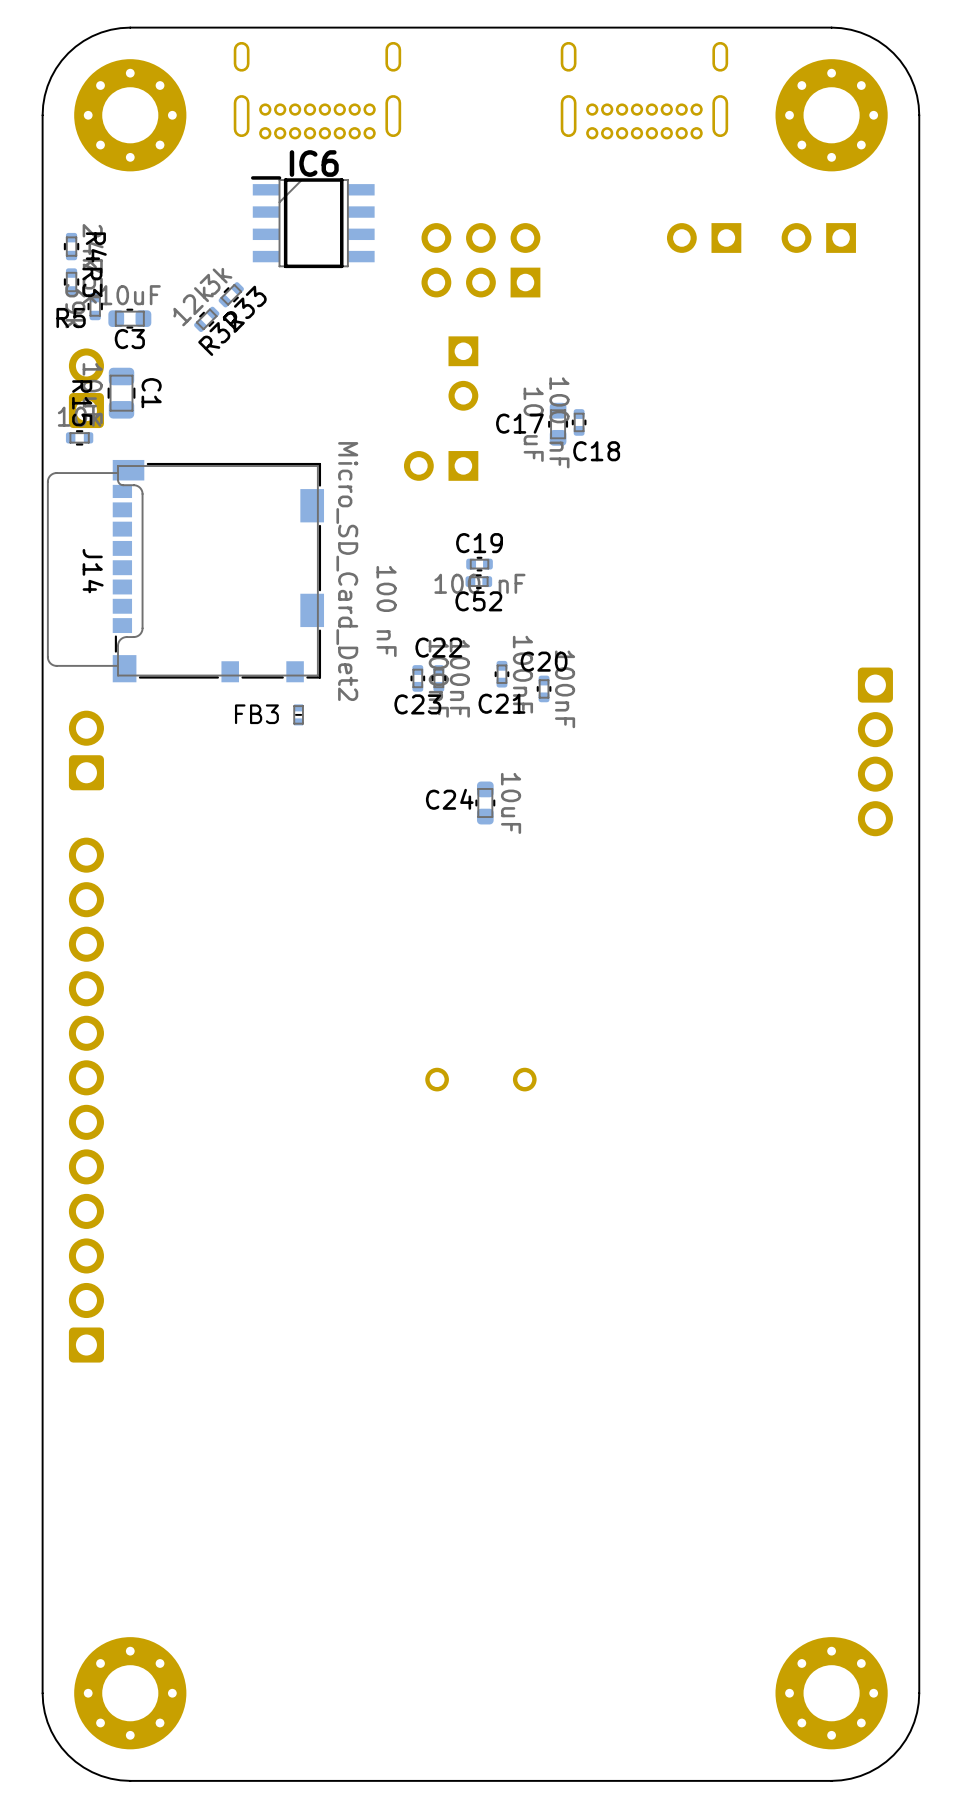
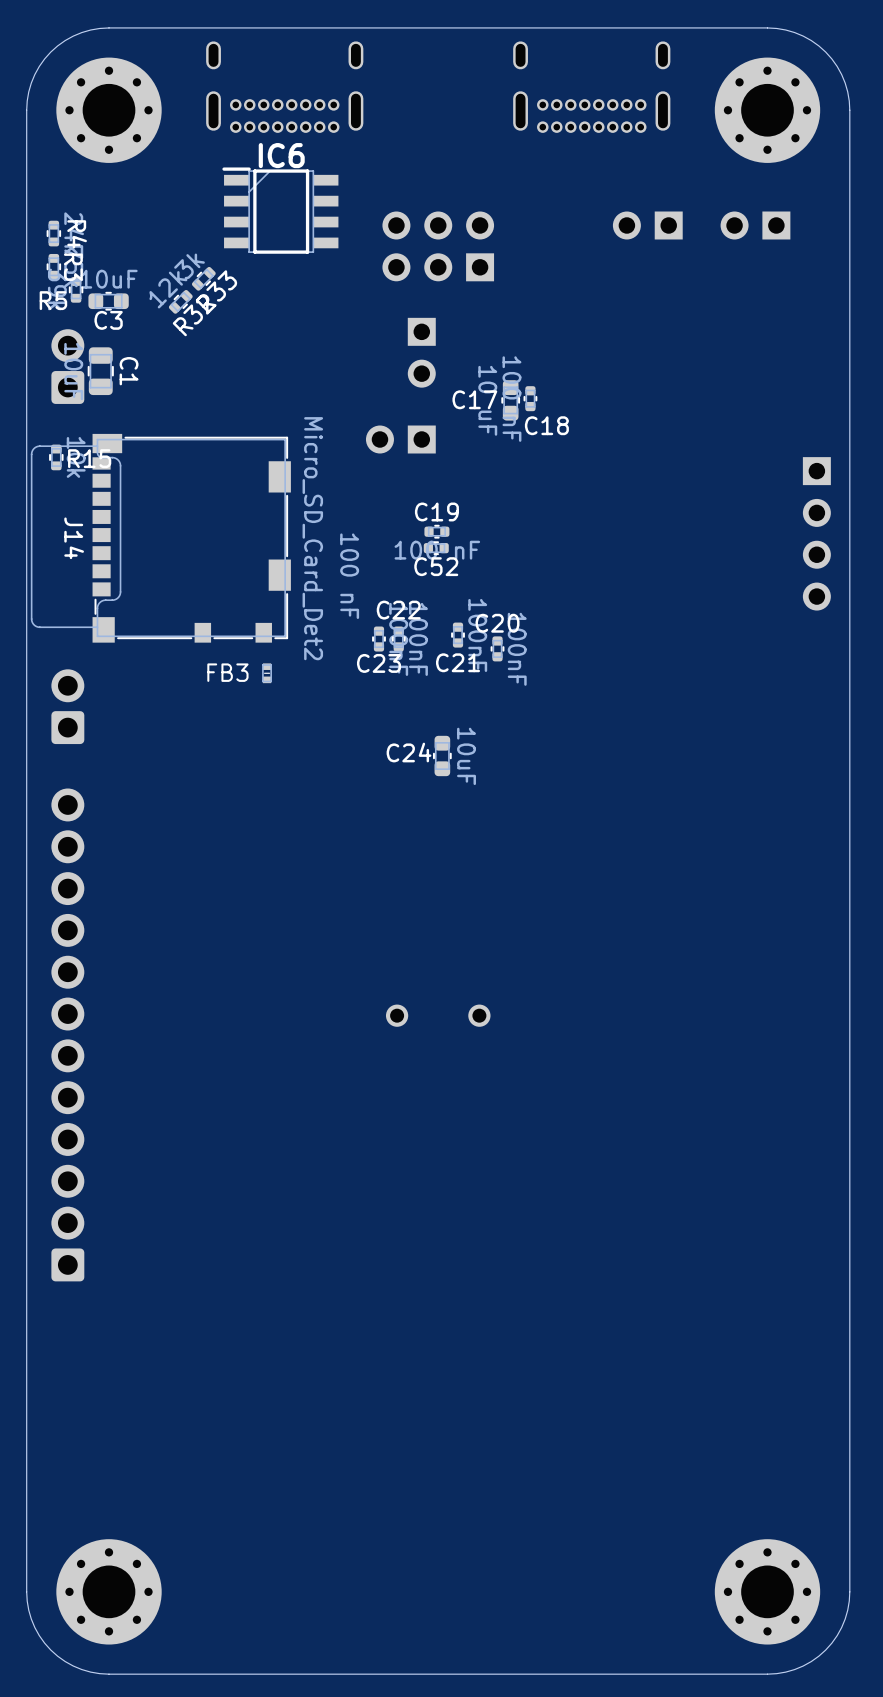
R15 rotation: 0° (79, 437) -> 90° clockwise (56, 457)
R15 position: (79, 437) -> (56, 457)
part: none -> (816, 533)
part: (875, 751) -> none

